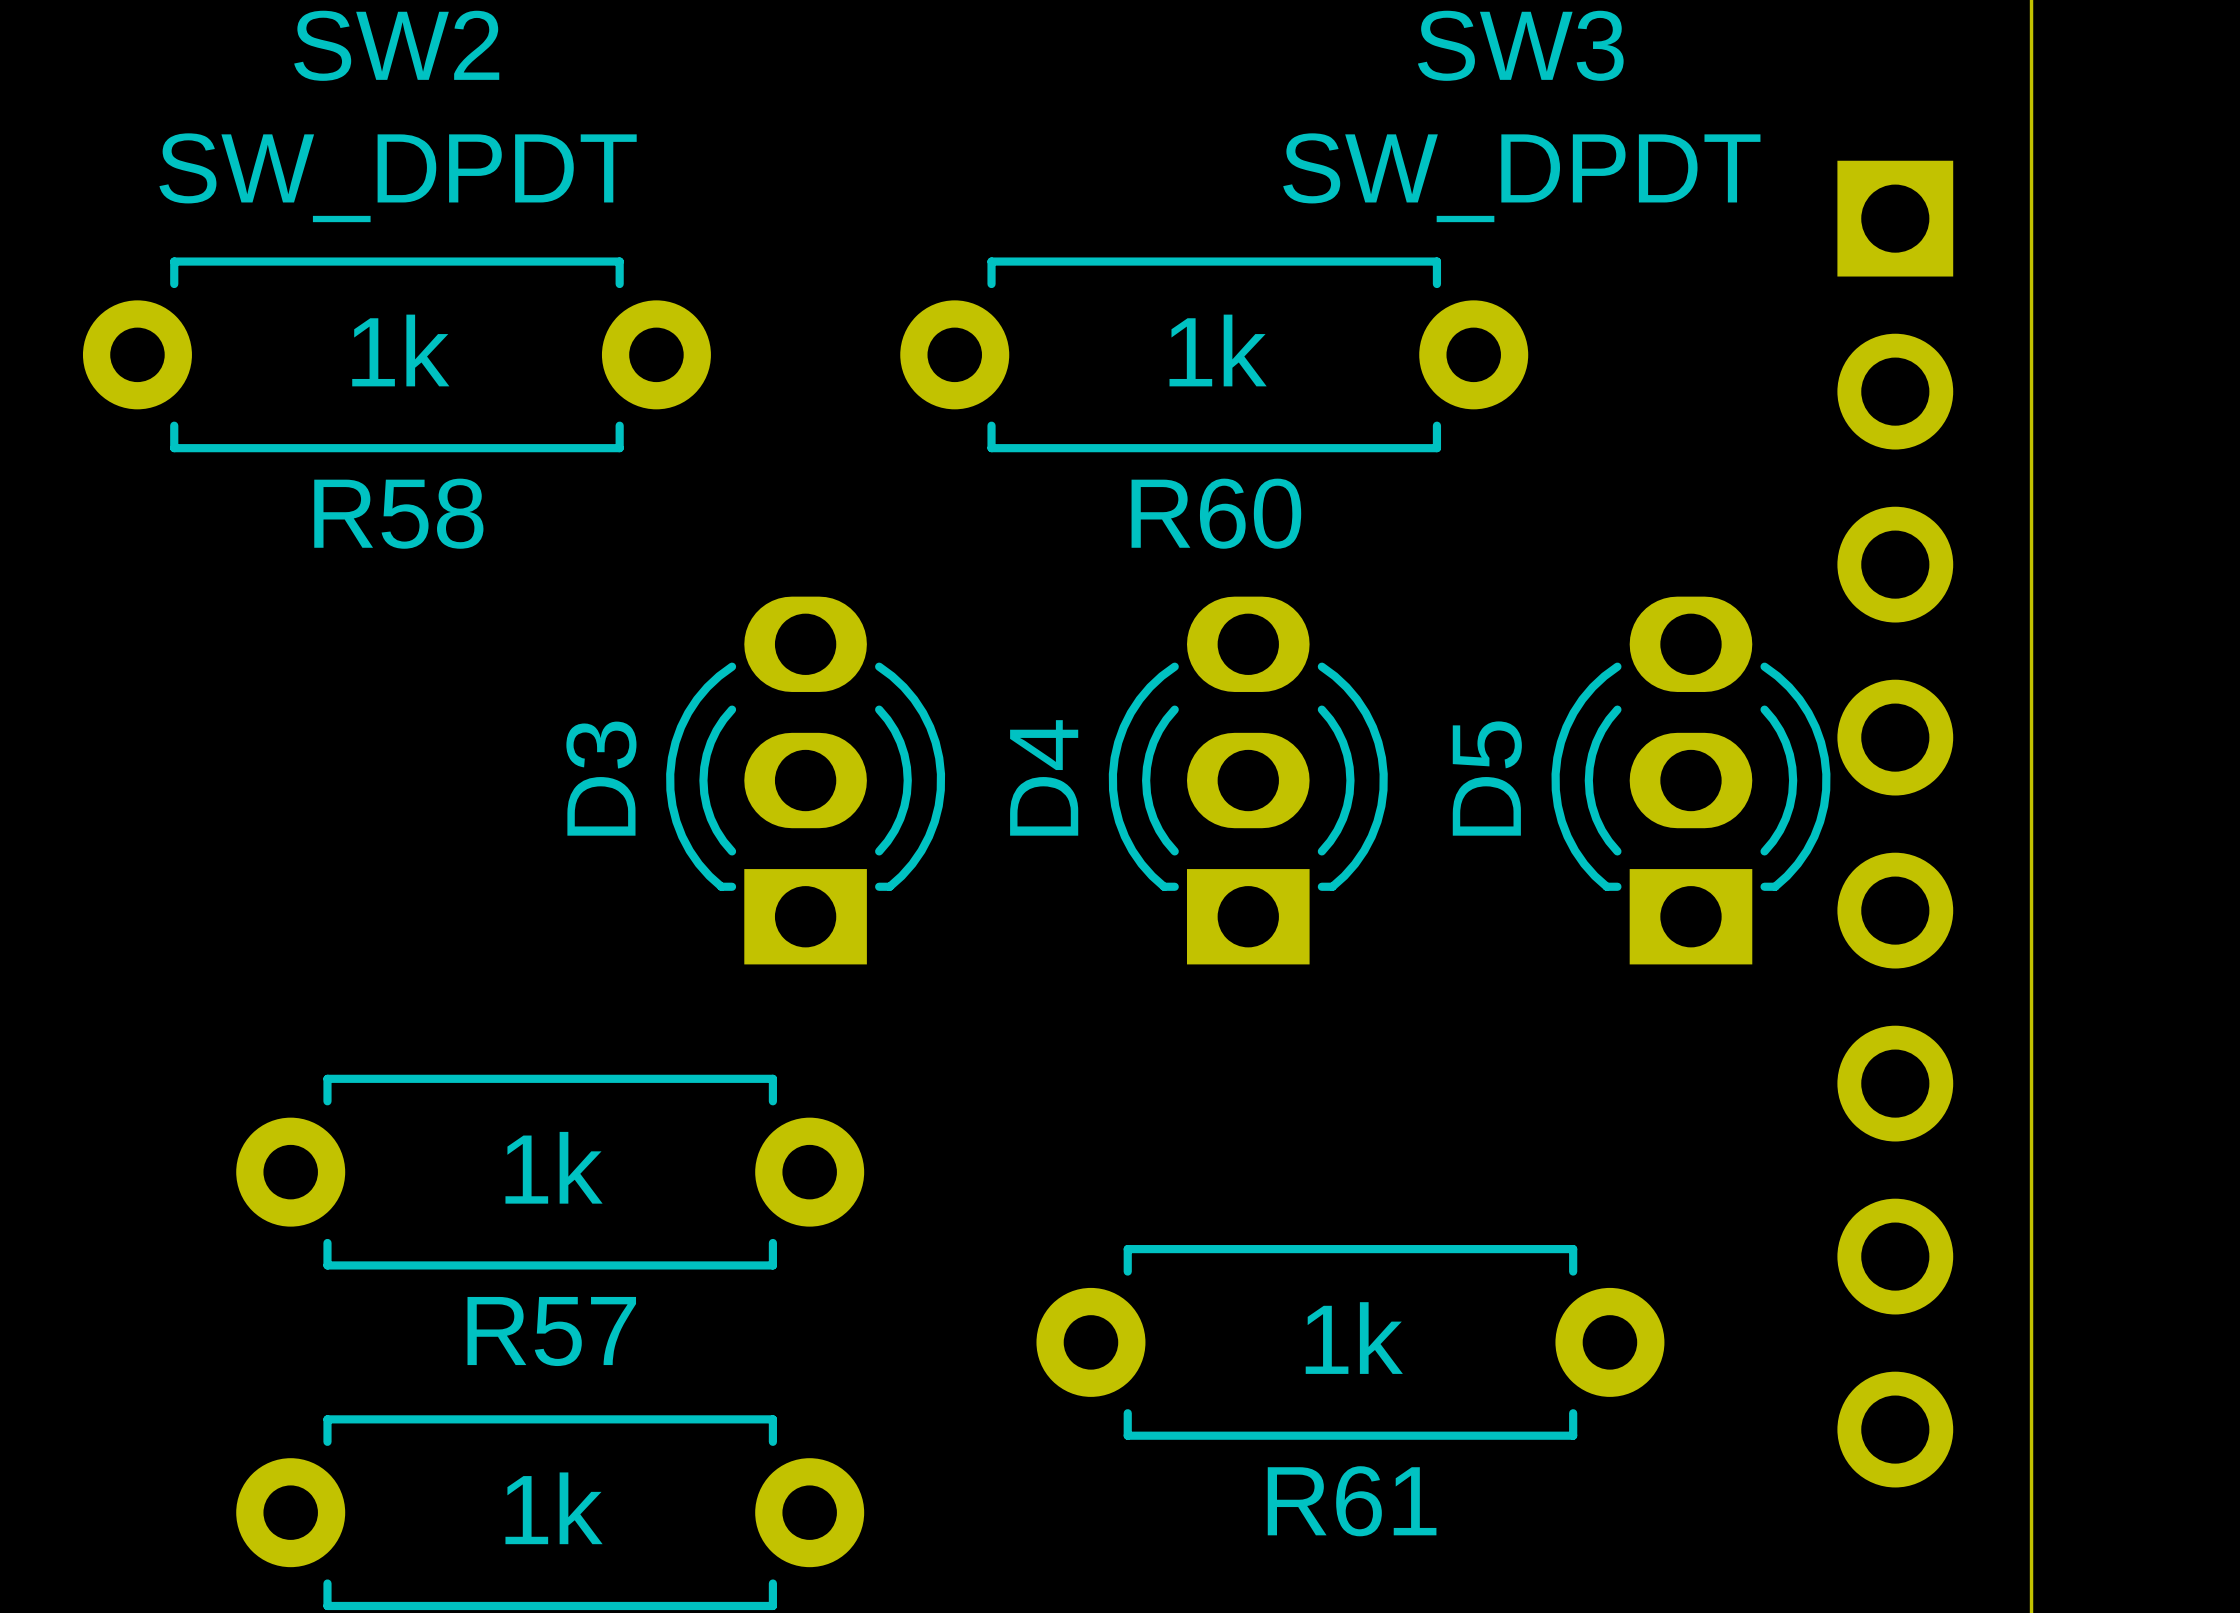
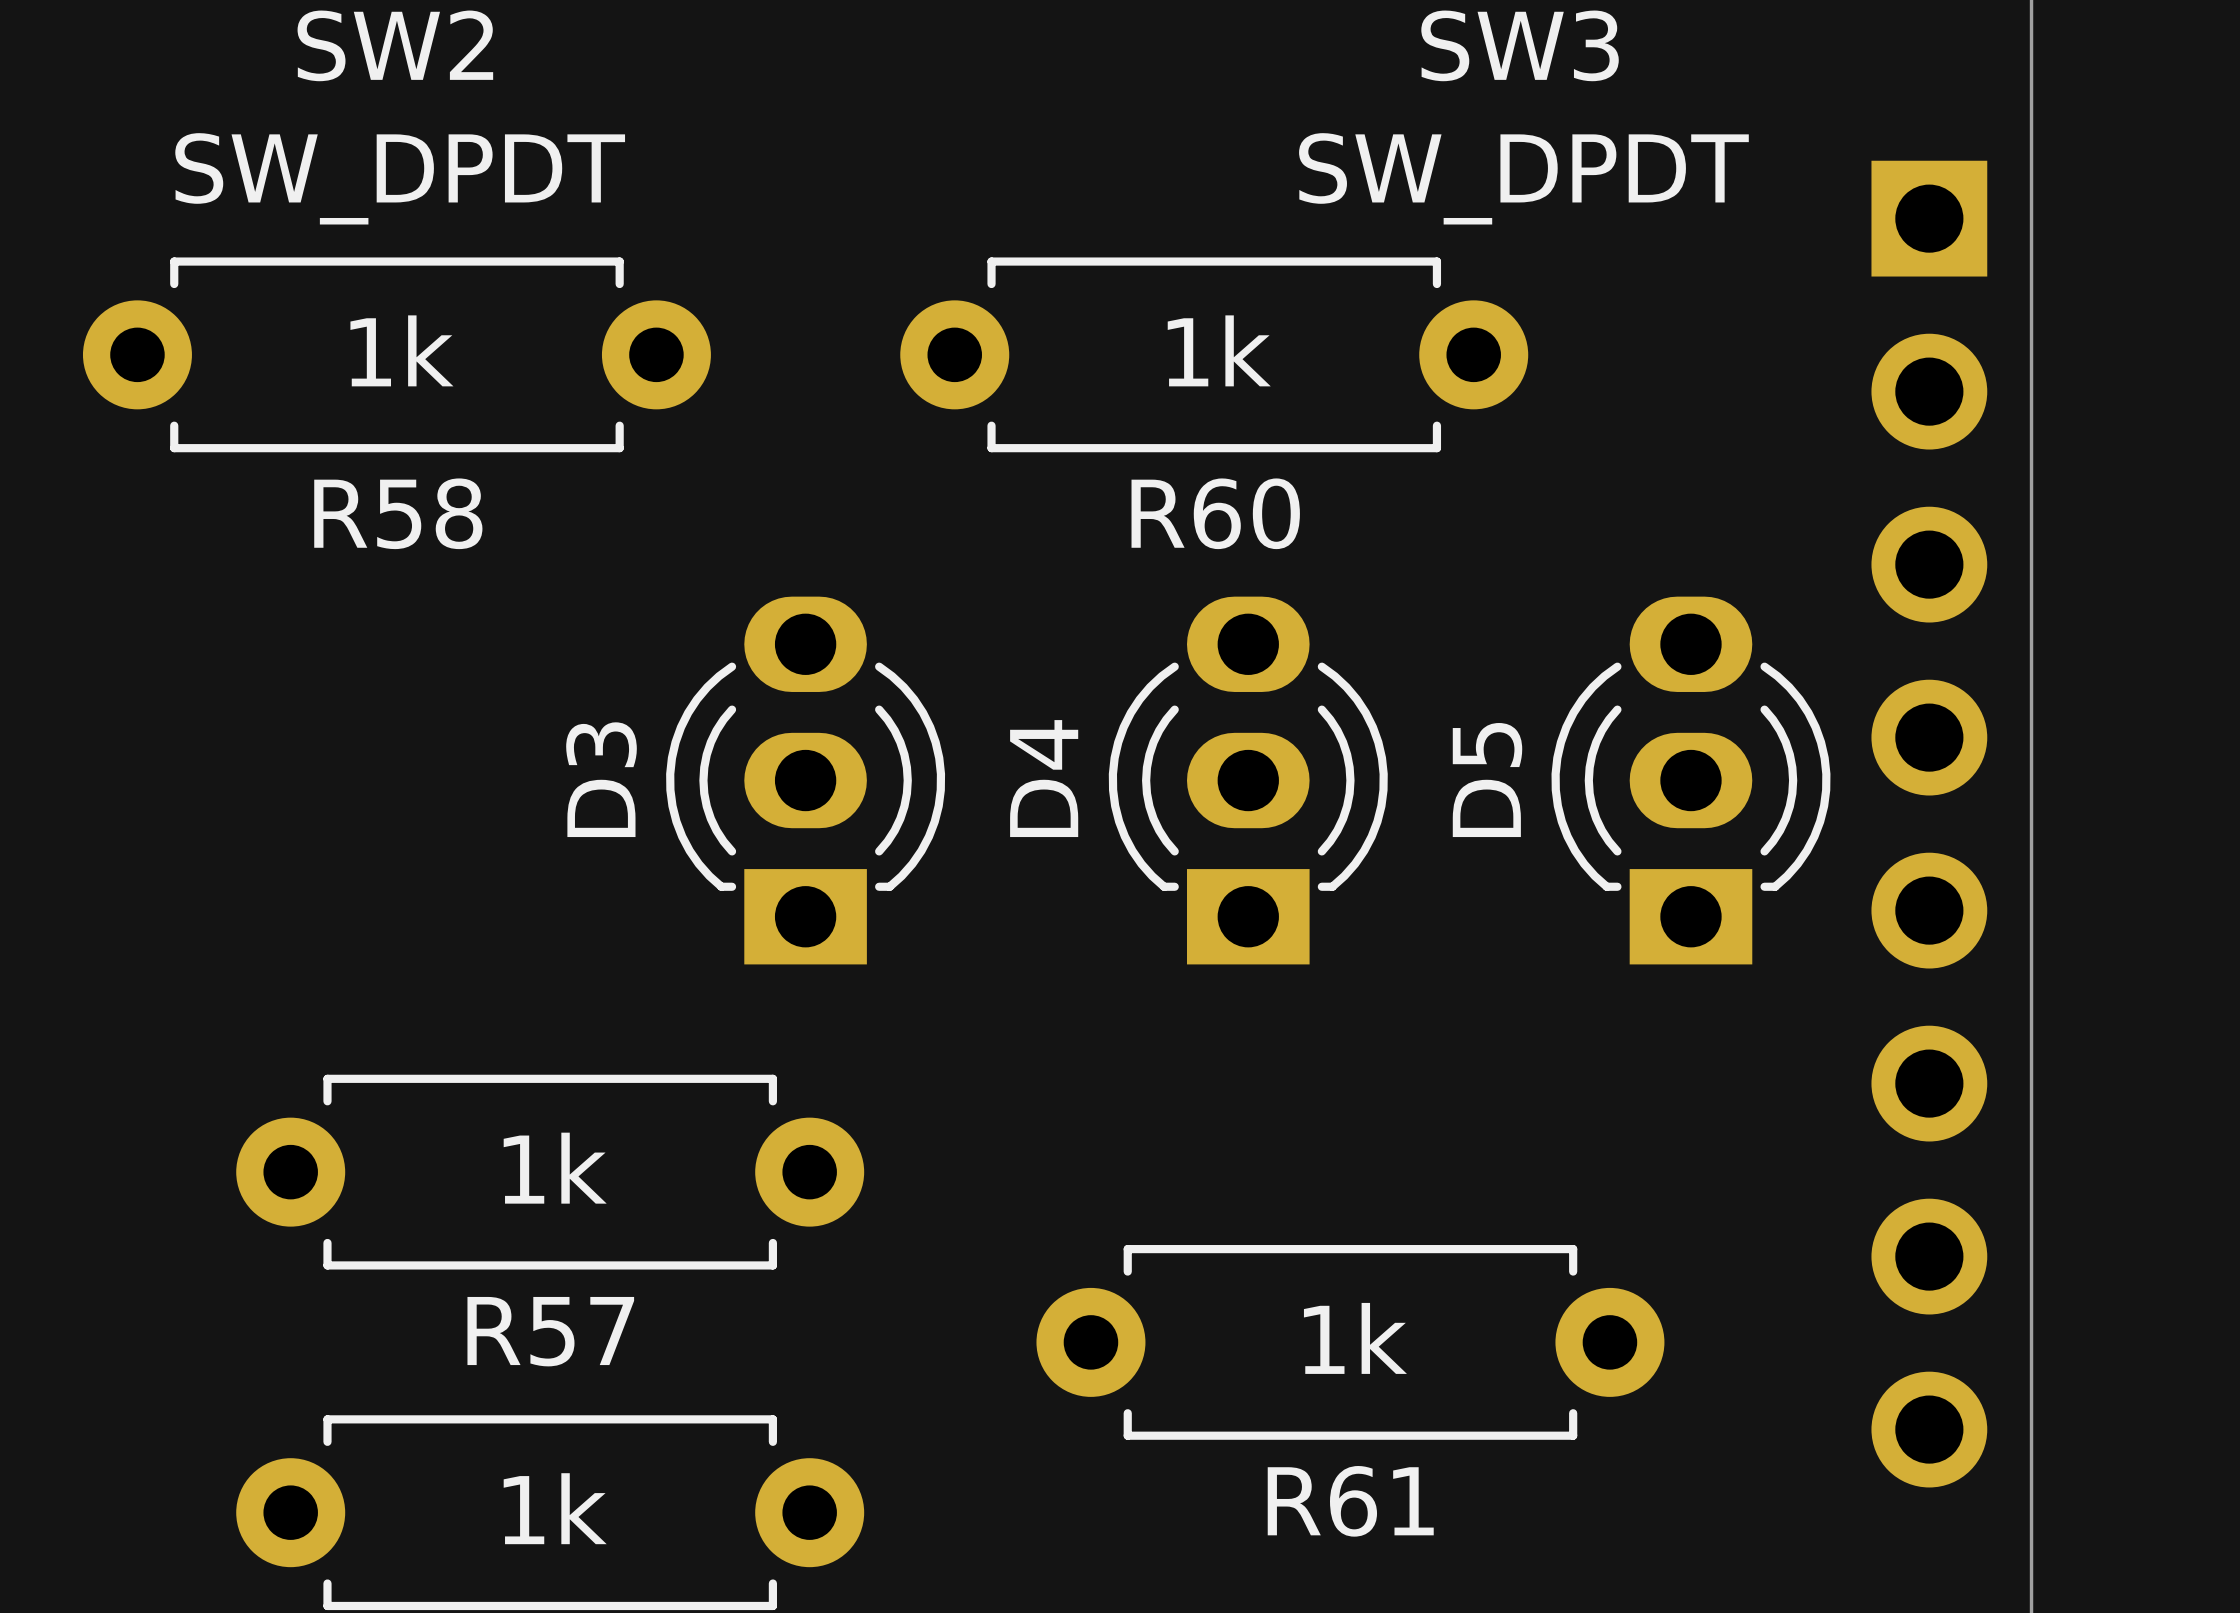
part position: (1895, 824) -> (1929, 824)

